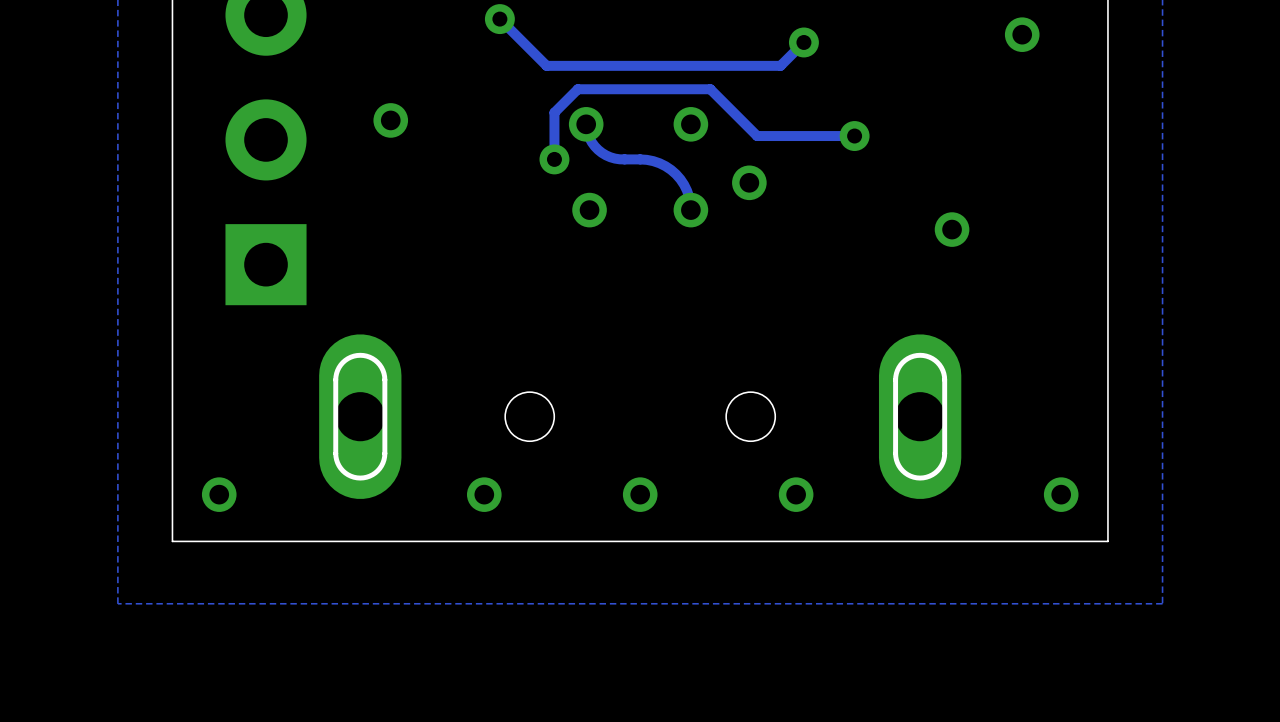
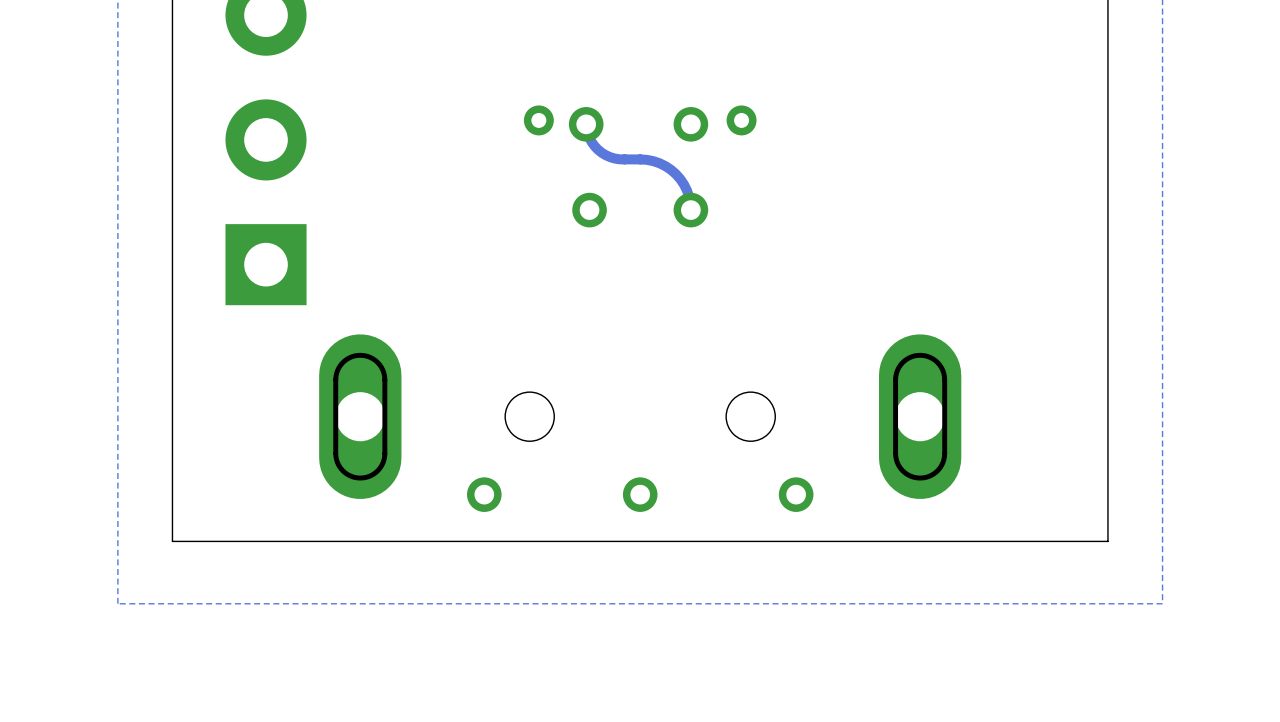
track: (499, 19) (546, 65) (780, 65) (803, 42) -> none
via: (499, 19) -> none
via: (1022, 34) -> none
via: (803, 42) -> none
via: (390, 120) -> none
via: none -> (741, 120)
track: (854, 136) (757, 136) (710, 89) (577, 89) (554, 112) (554, 159) -> none
via: (854, 136) -> none
via position: (554, 159) -> (538, 120)
via: (749, 182) -> none
via: (952, 229) -> none
via: (219, 494) -> none
via: (1061, 494) -> none

